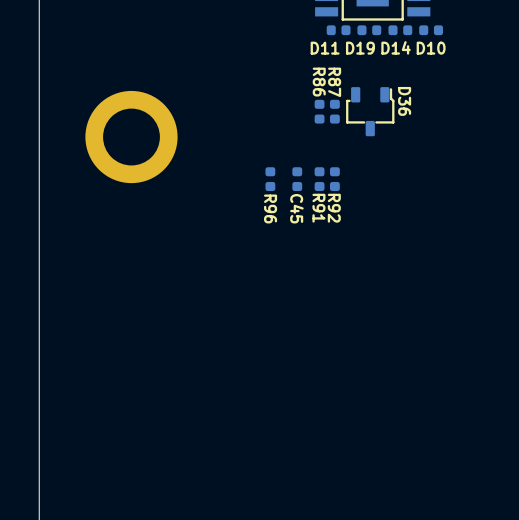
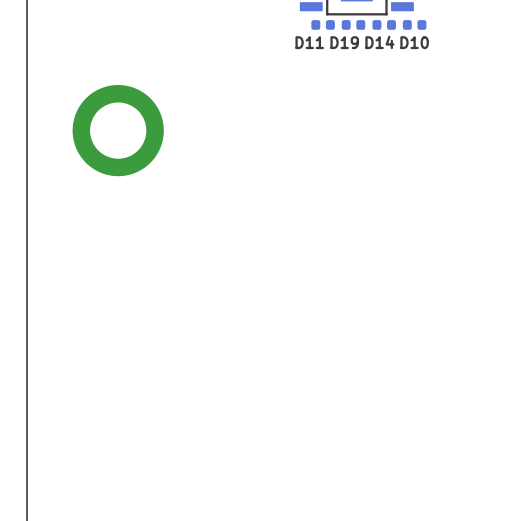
R86: (319, 111) -> none
R87: (334, 111) -> none
D36: (370, 111) -> none
R96: (270, 179) -> none
C45: (297, 179) -> none
R91: (319, 179) -> none
R92: (334, 179) -> none

